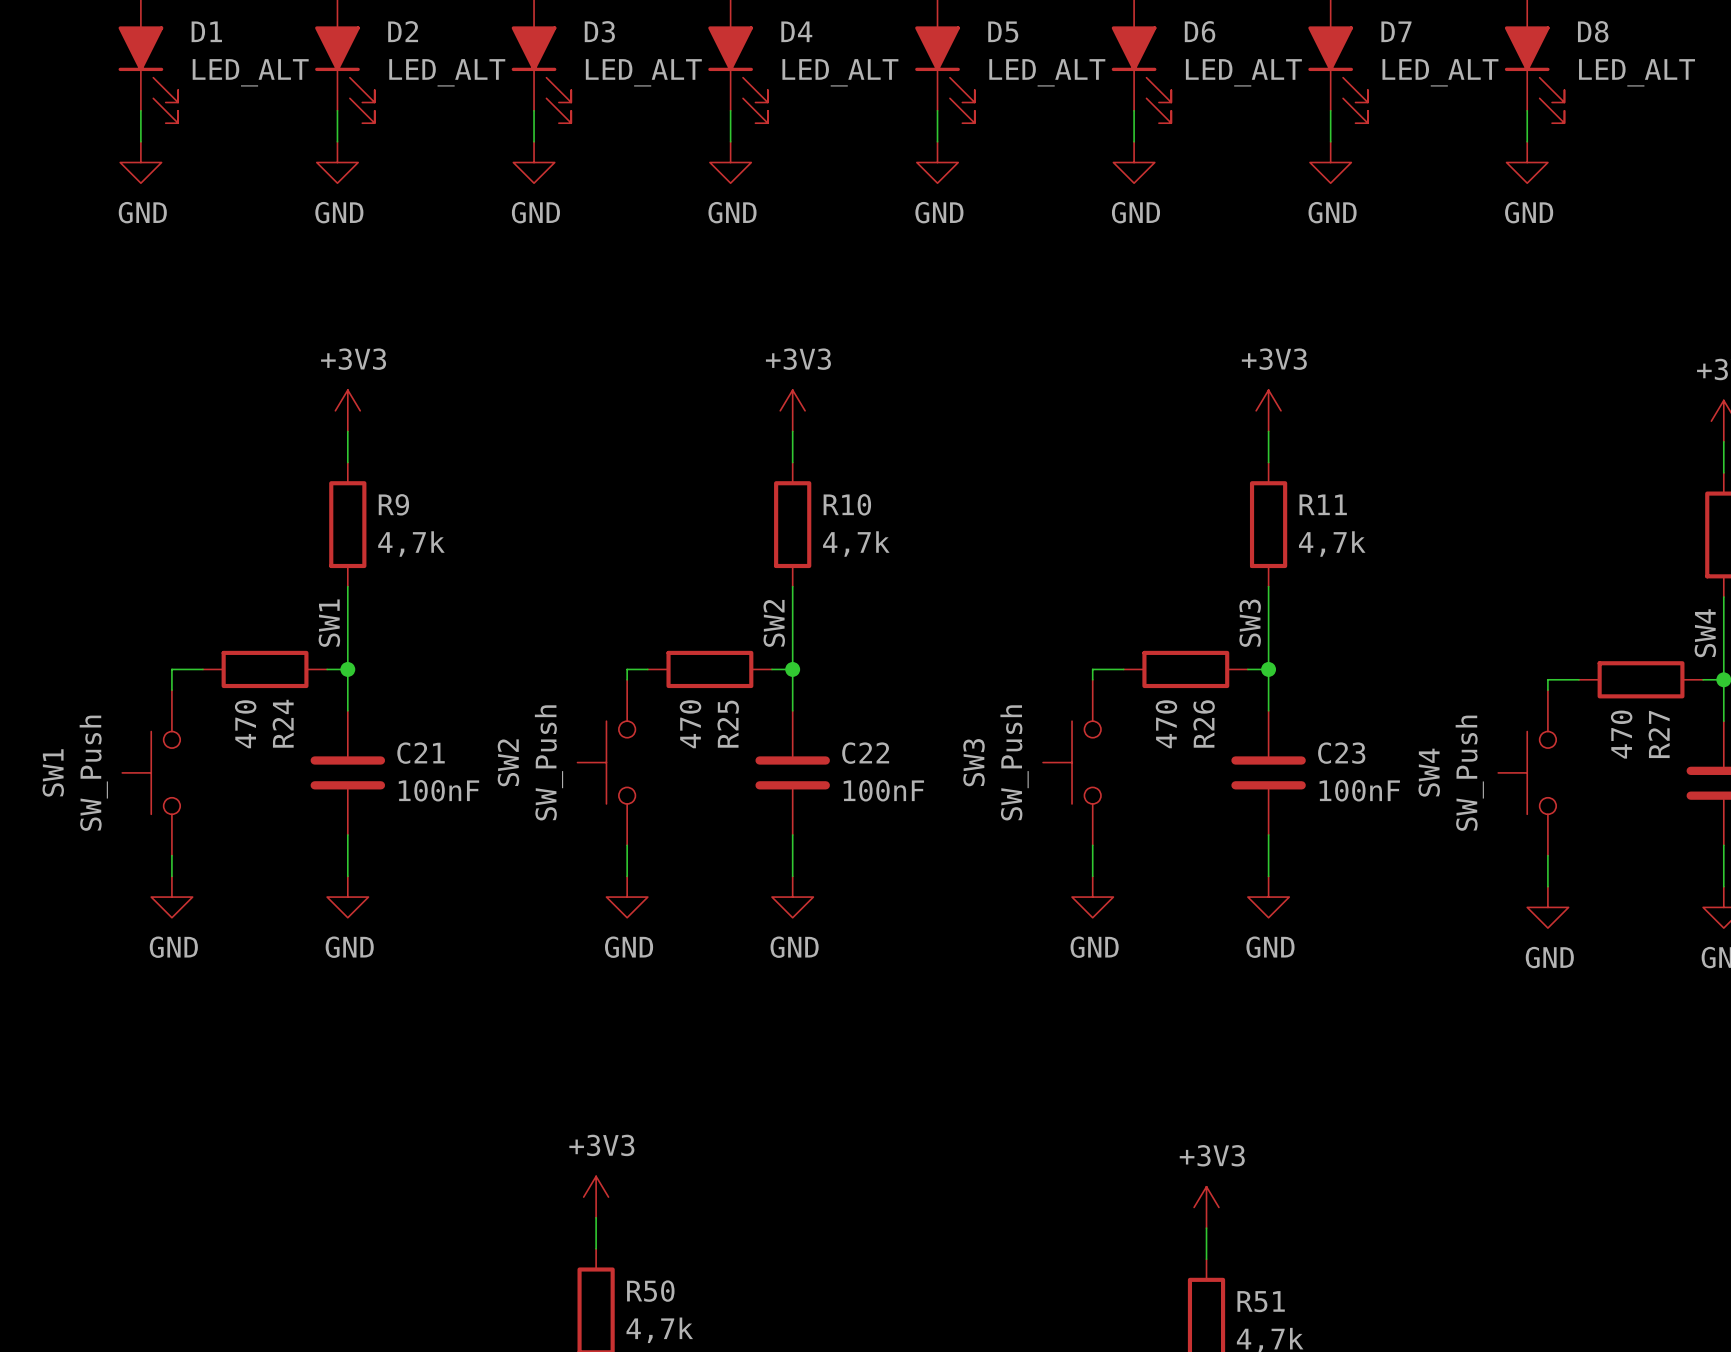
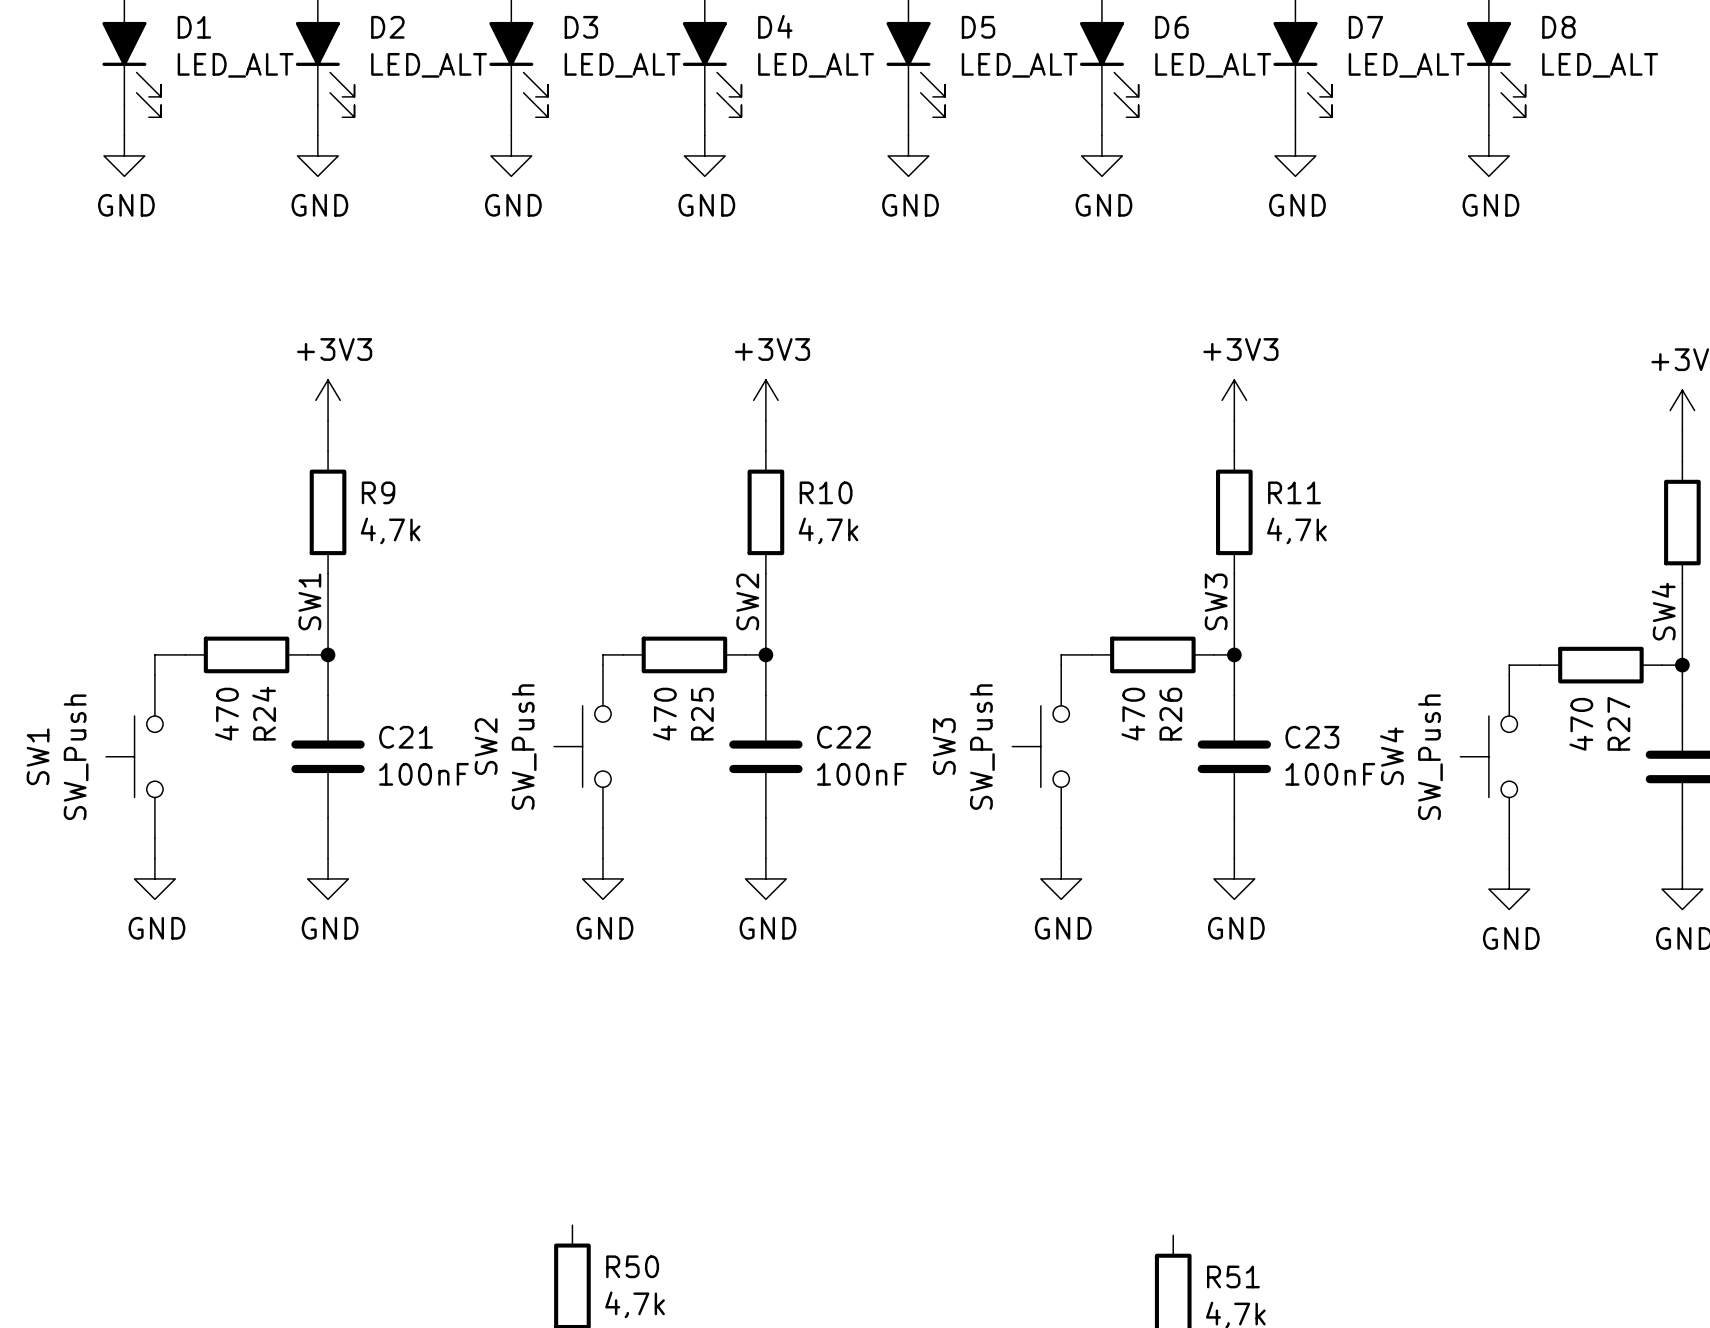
power symbol: +3V3 (596, 1197) -> none
power symbol: +3V3 (1206, 1207) -> none
wire: (596, 1217) (596, 1248) -> none
wire: (1206, 1228) (1206, 1259) -> none

